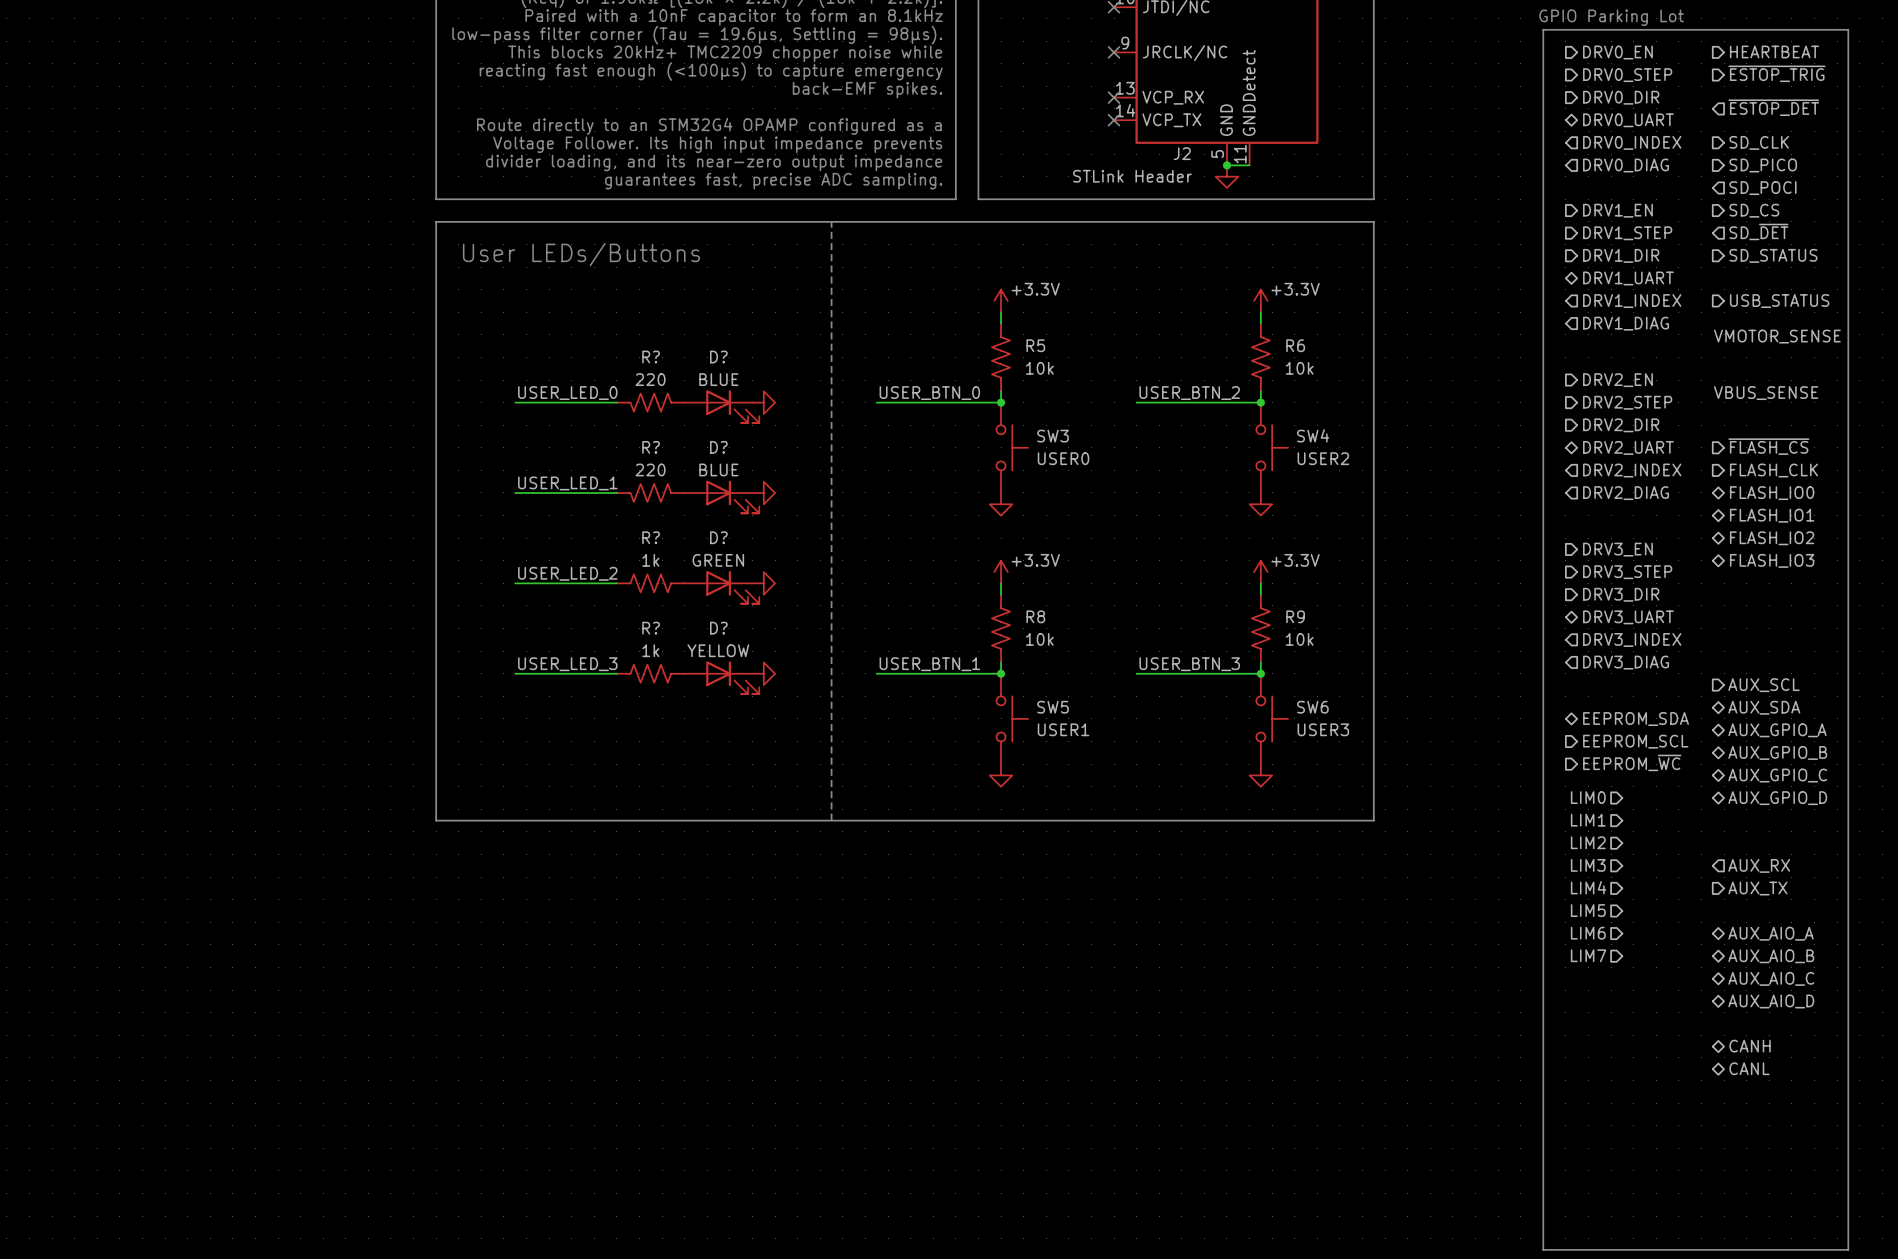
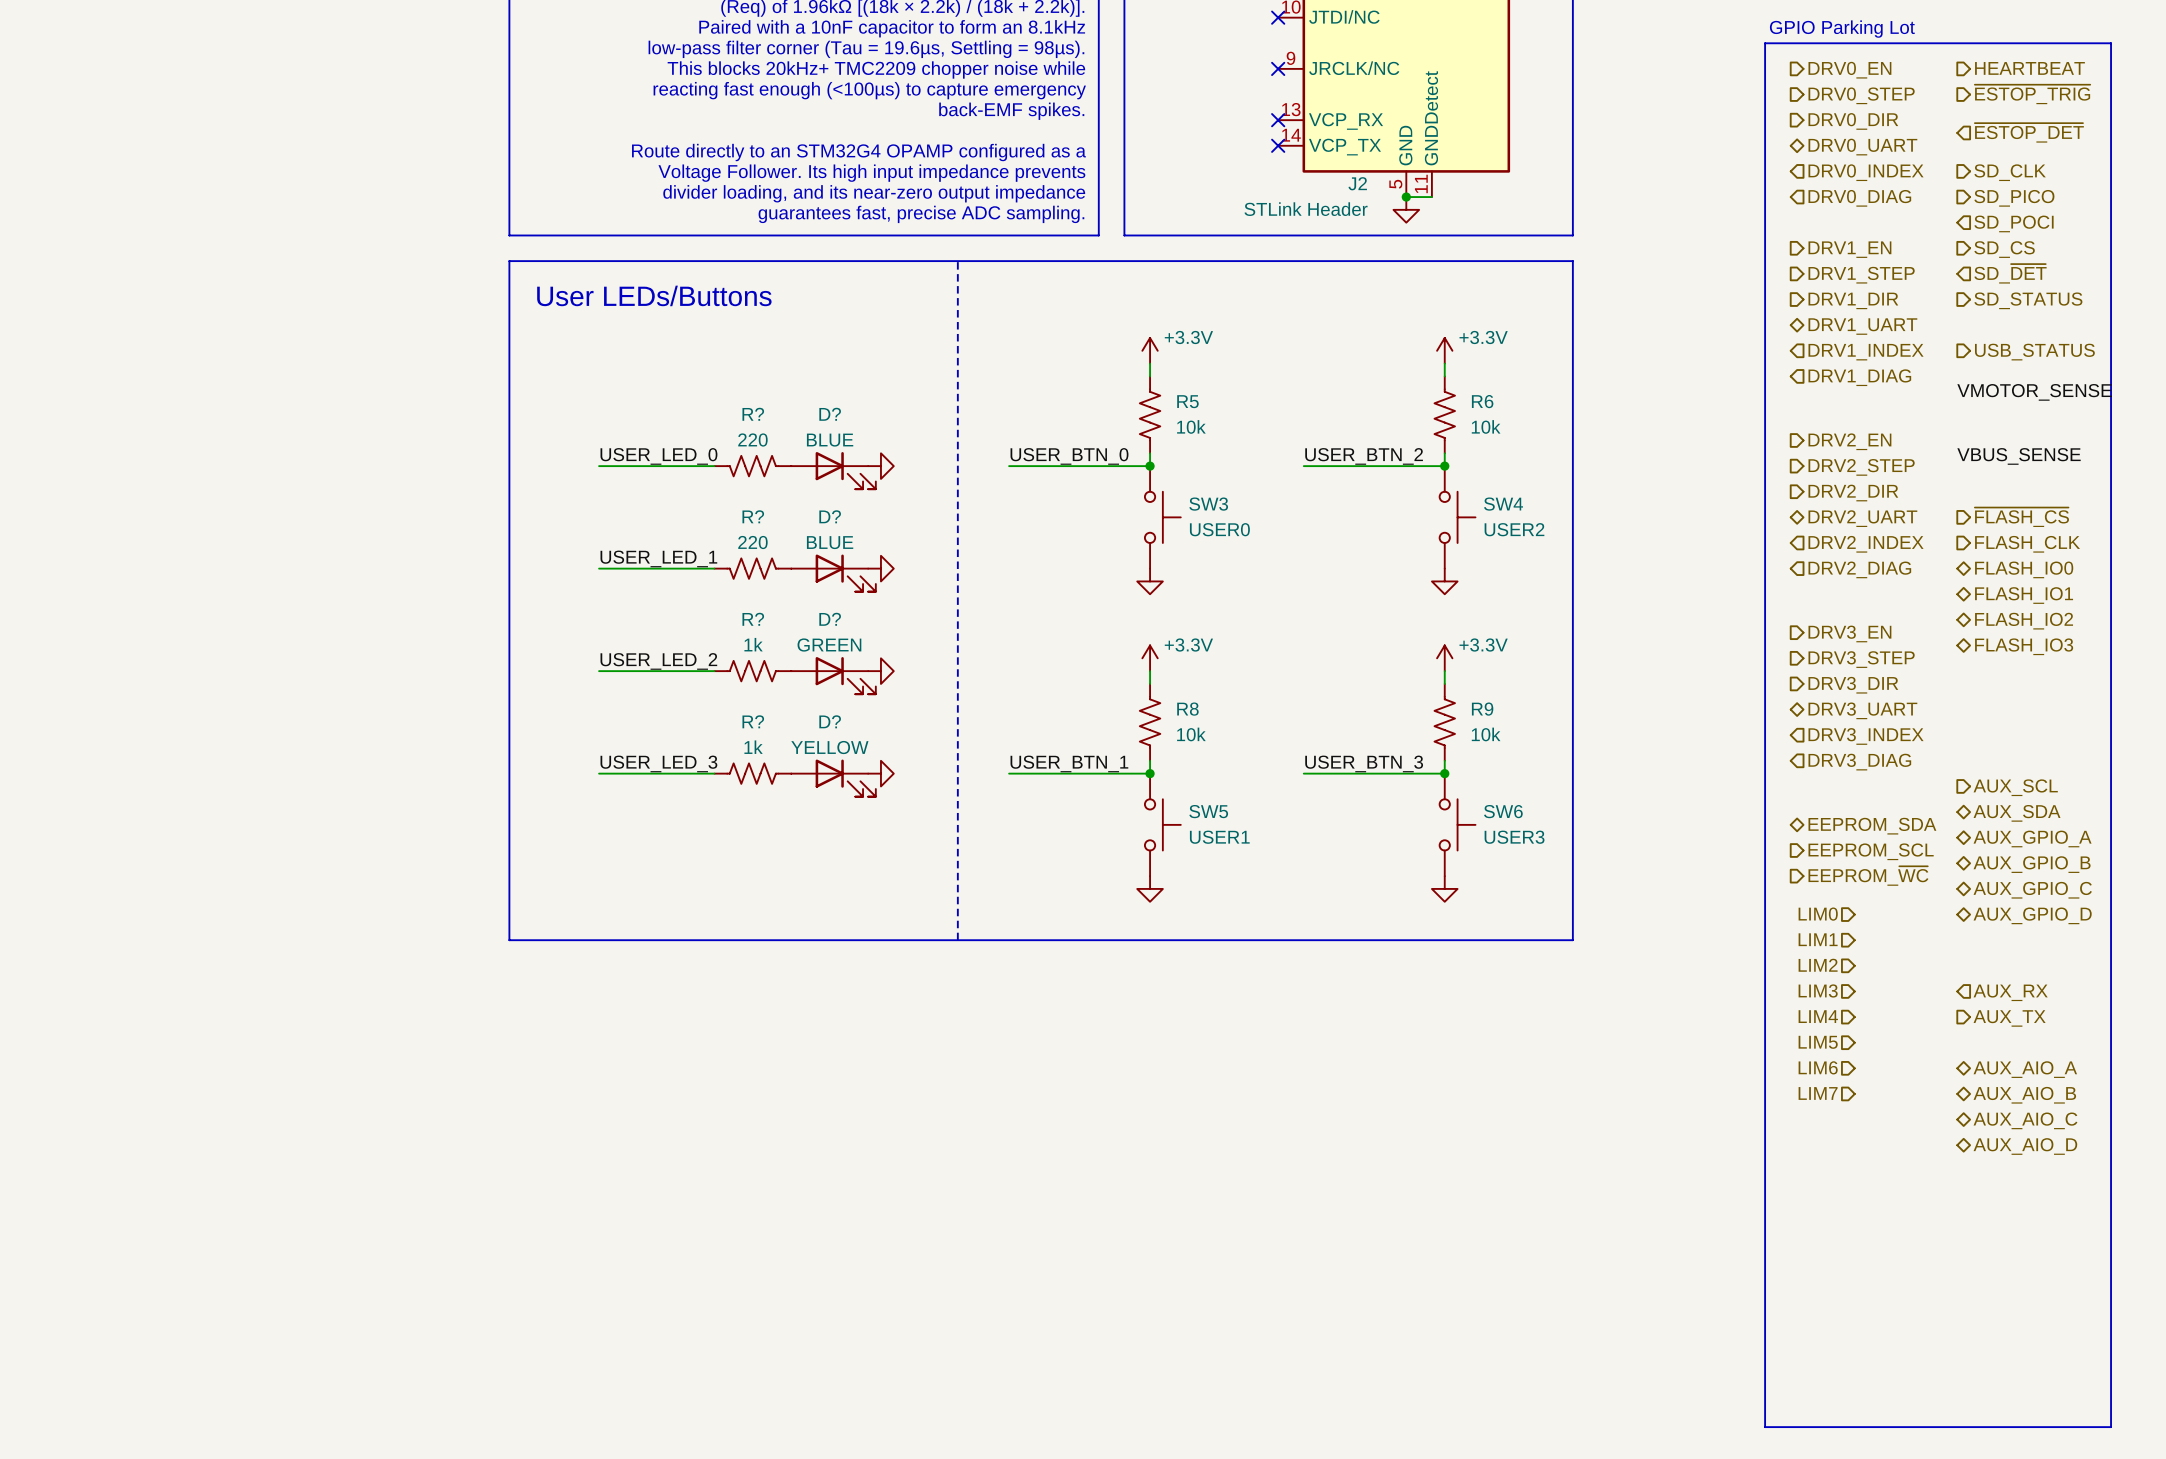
hierarchical label: CANH (1750, 1046) -> none
hierarchical label: CANL (1749, 1068) -> none

